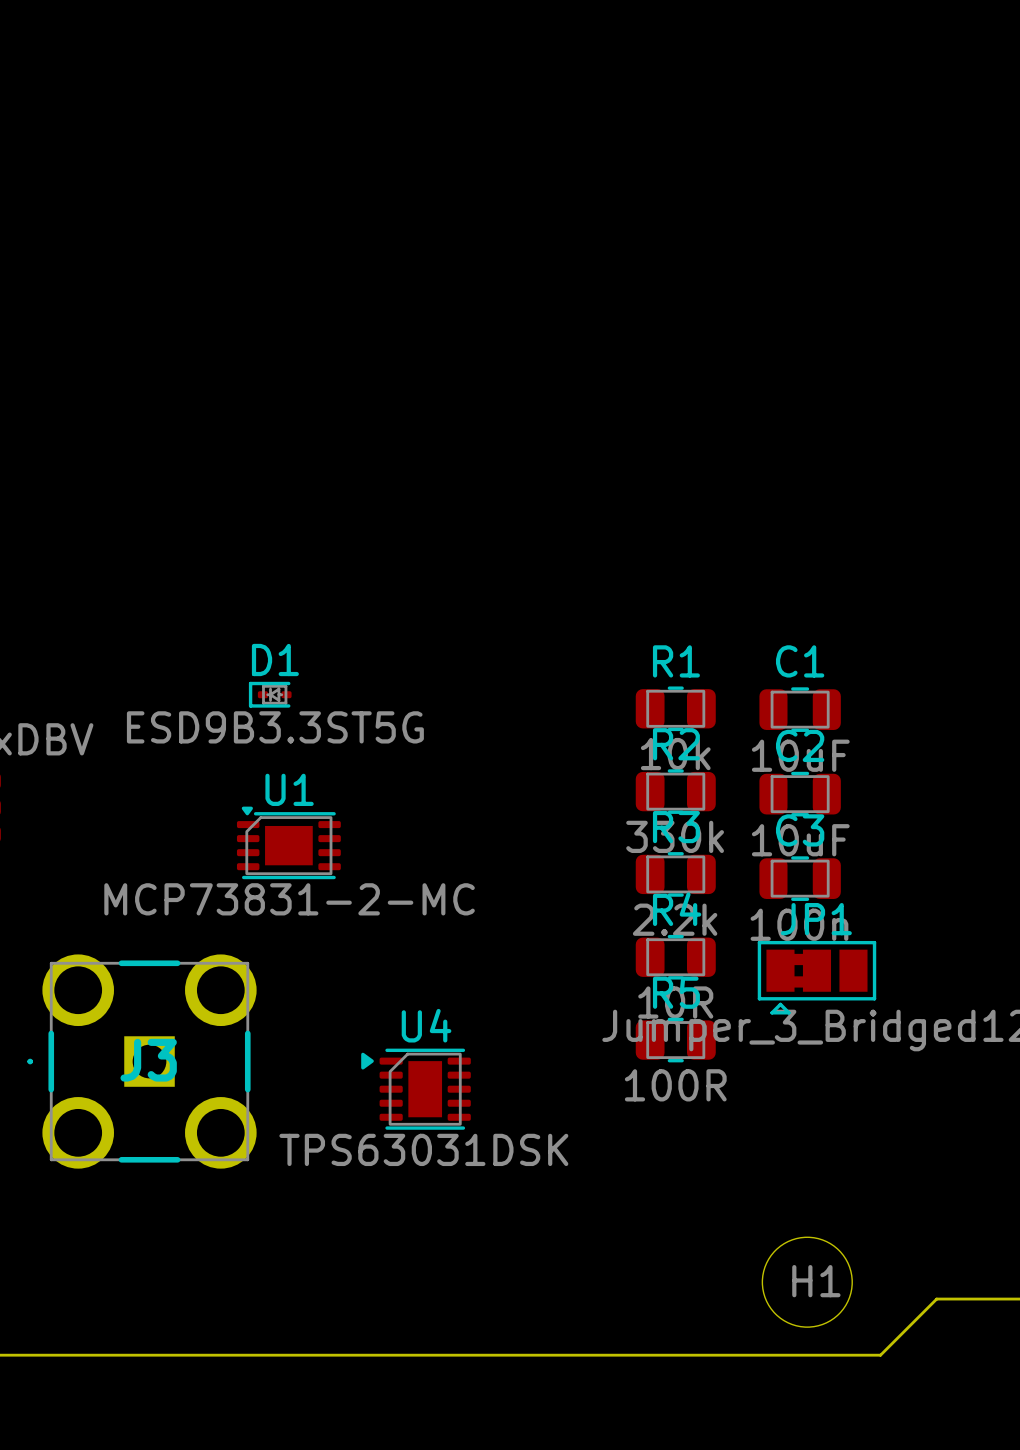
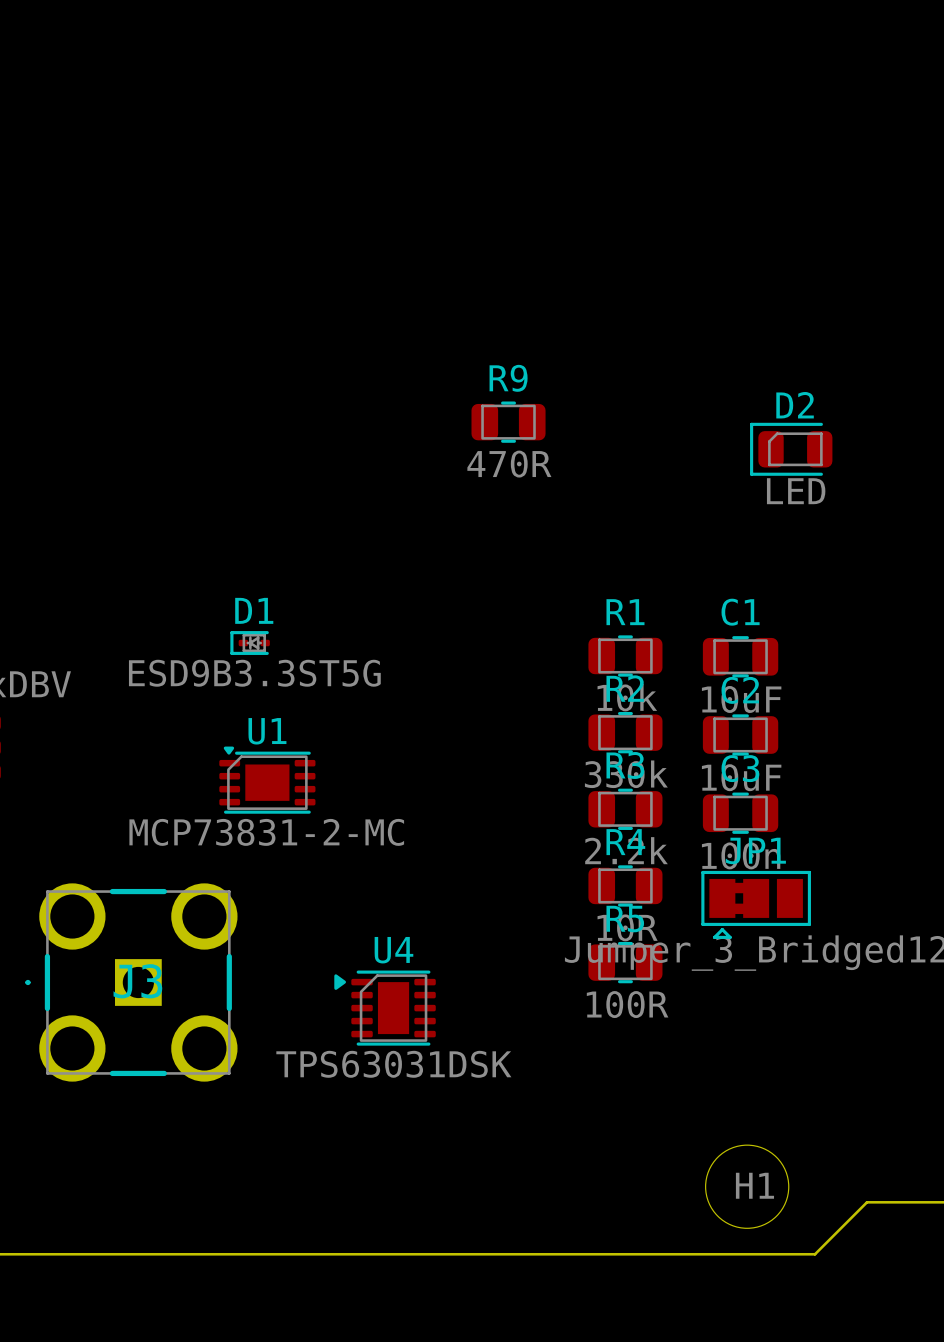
R9: none -> 470R (508, 422)
D2: none -> LED (791, 449)

